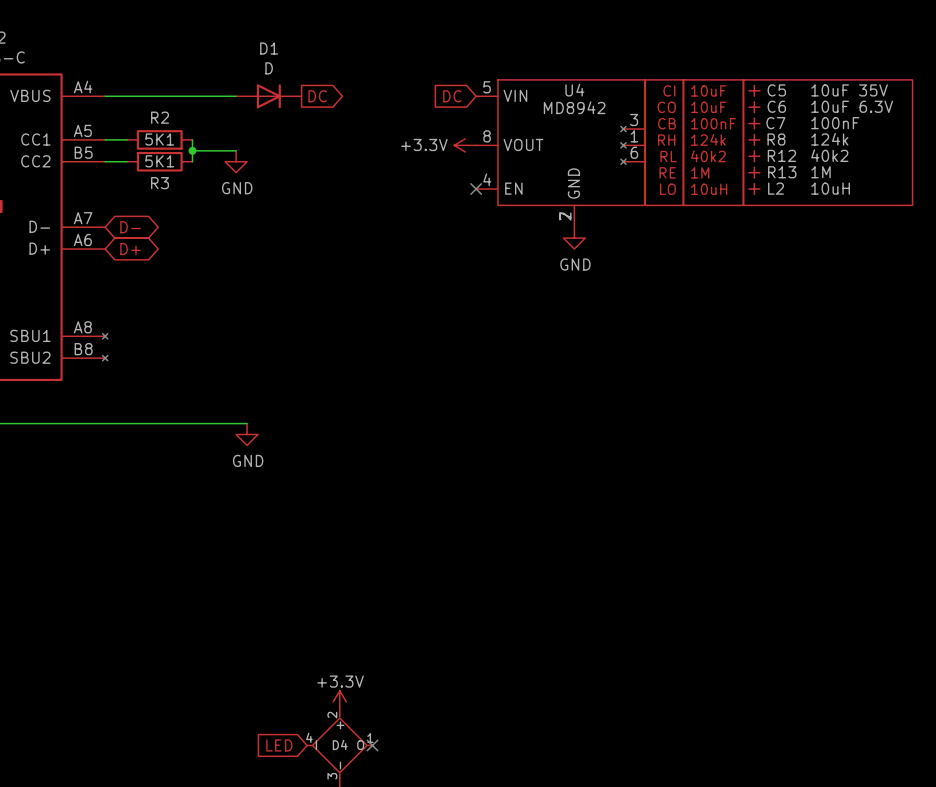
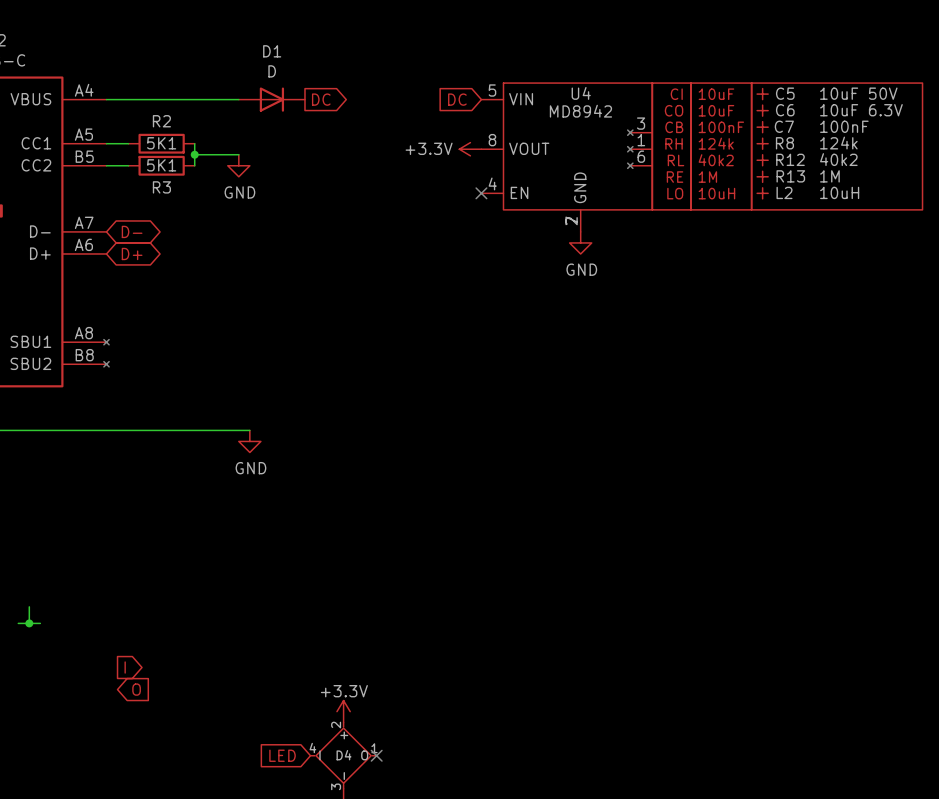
C5 value: 10uF 35V (849, 90) -> 10uF 50V (858, 93)
wire: none -> (29, 606) (29, 623)
wire: none -> (18, 623) (40, 623)
junction: none -> (29, 623)
global label: none -> I (125, 667)
global label: none -> O (136, 689)

